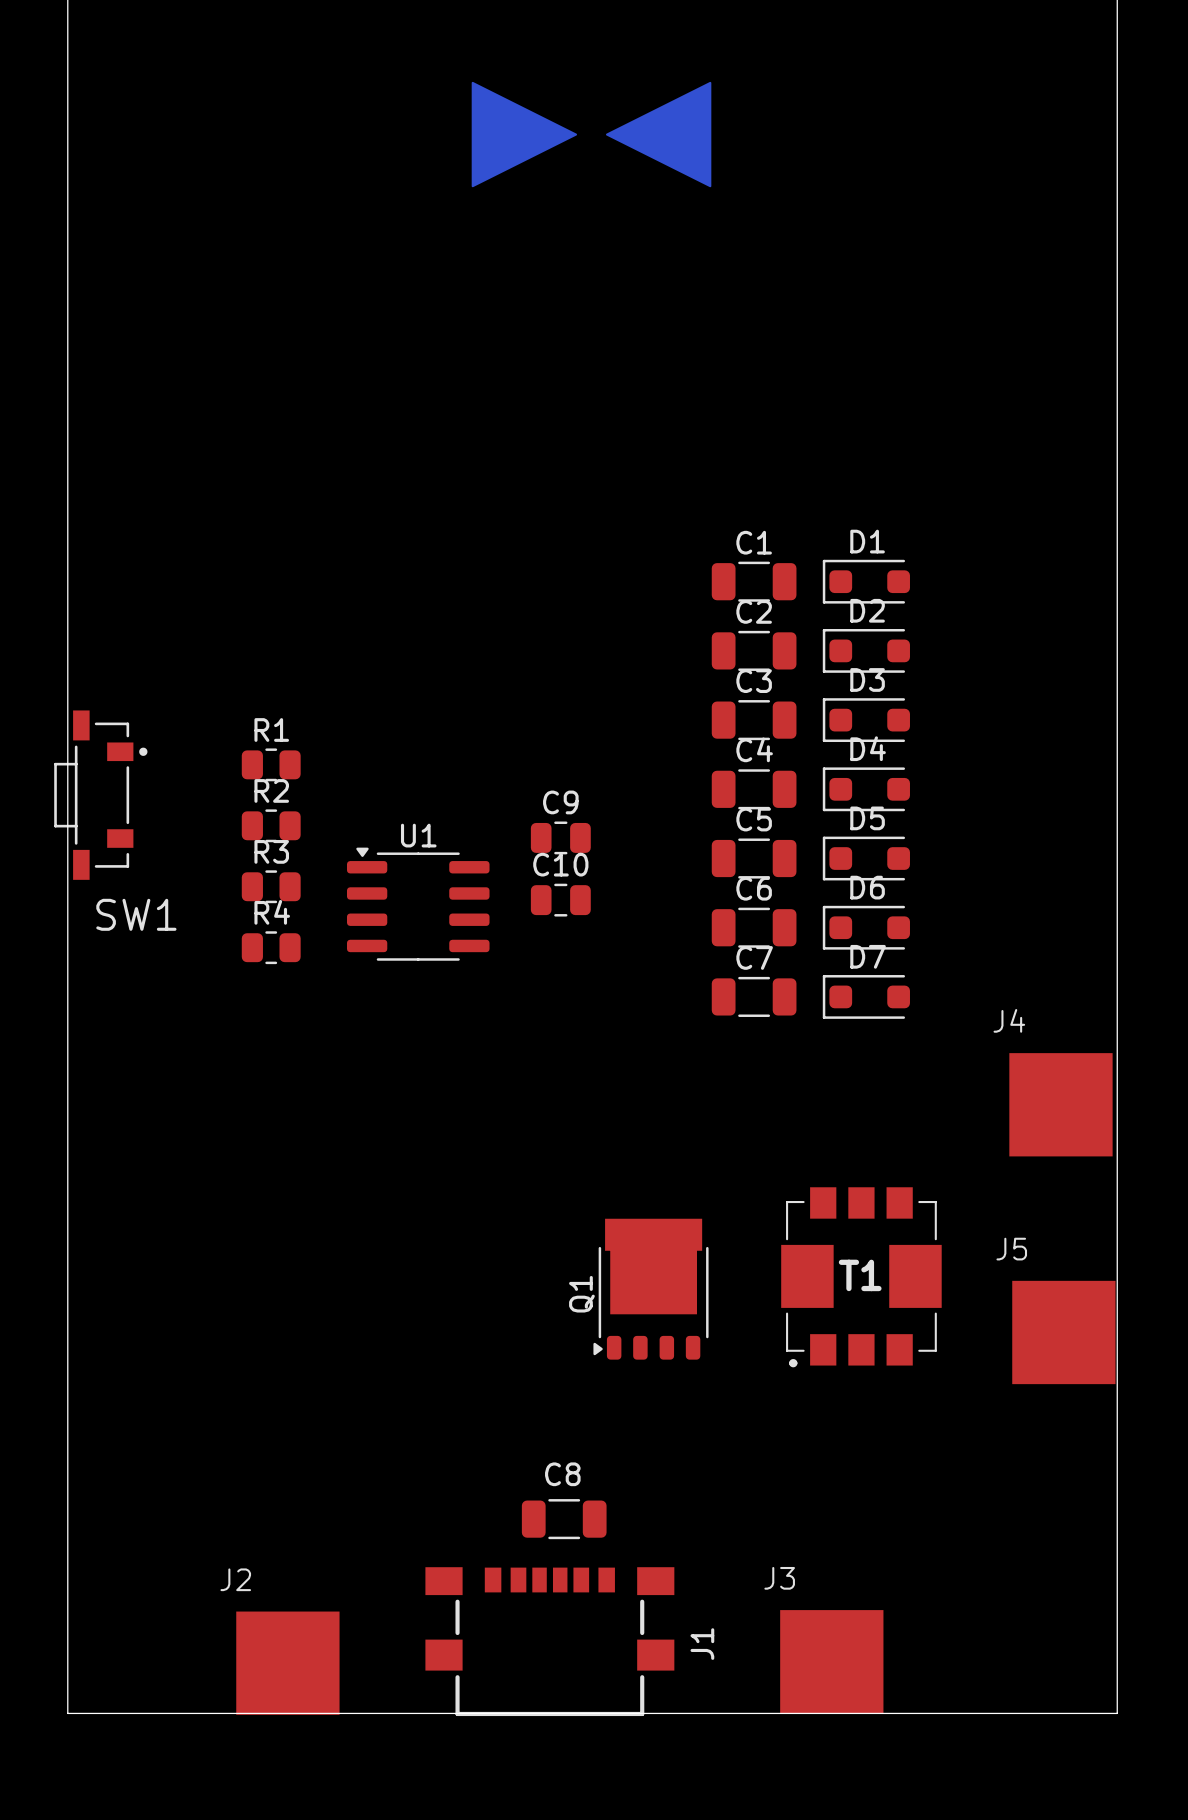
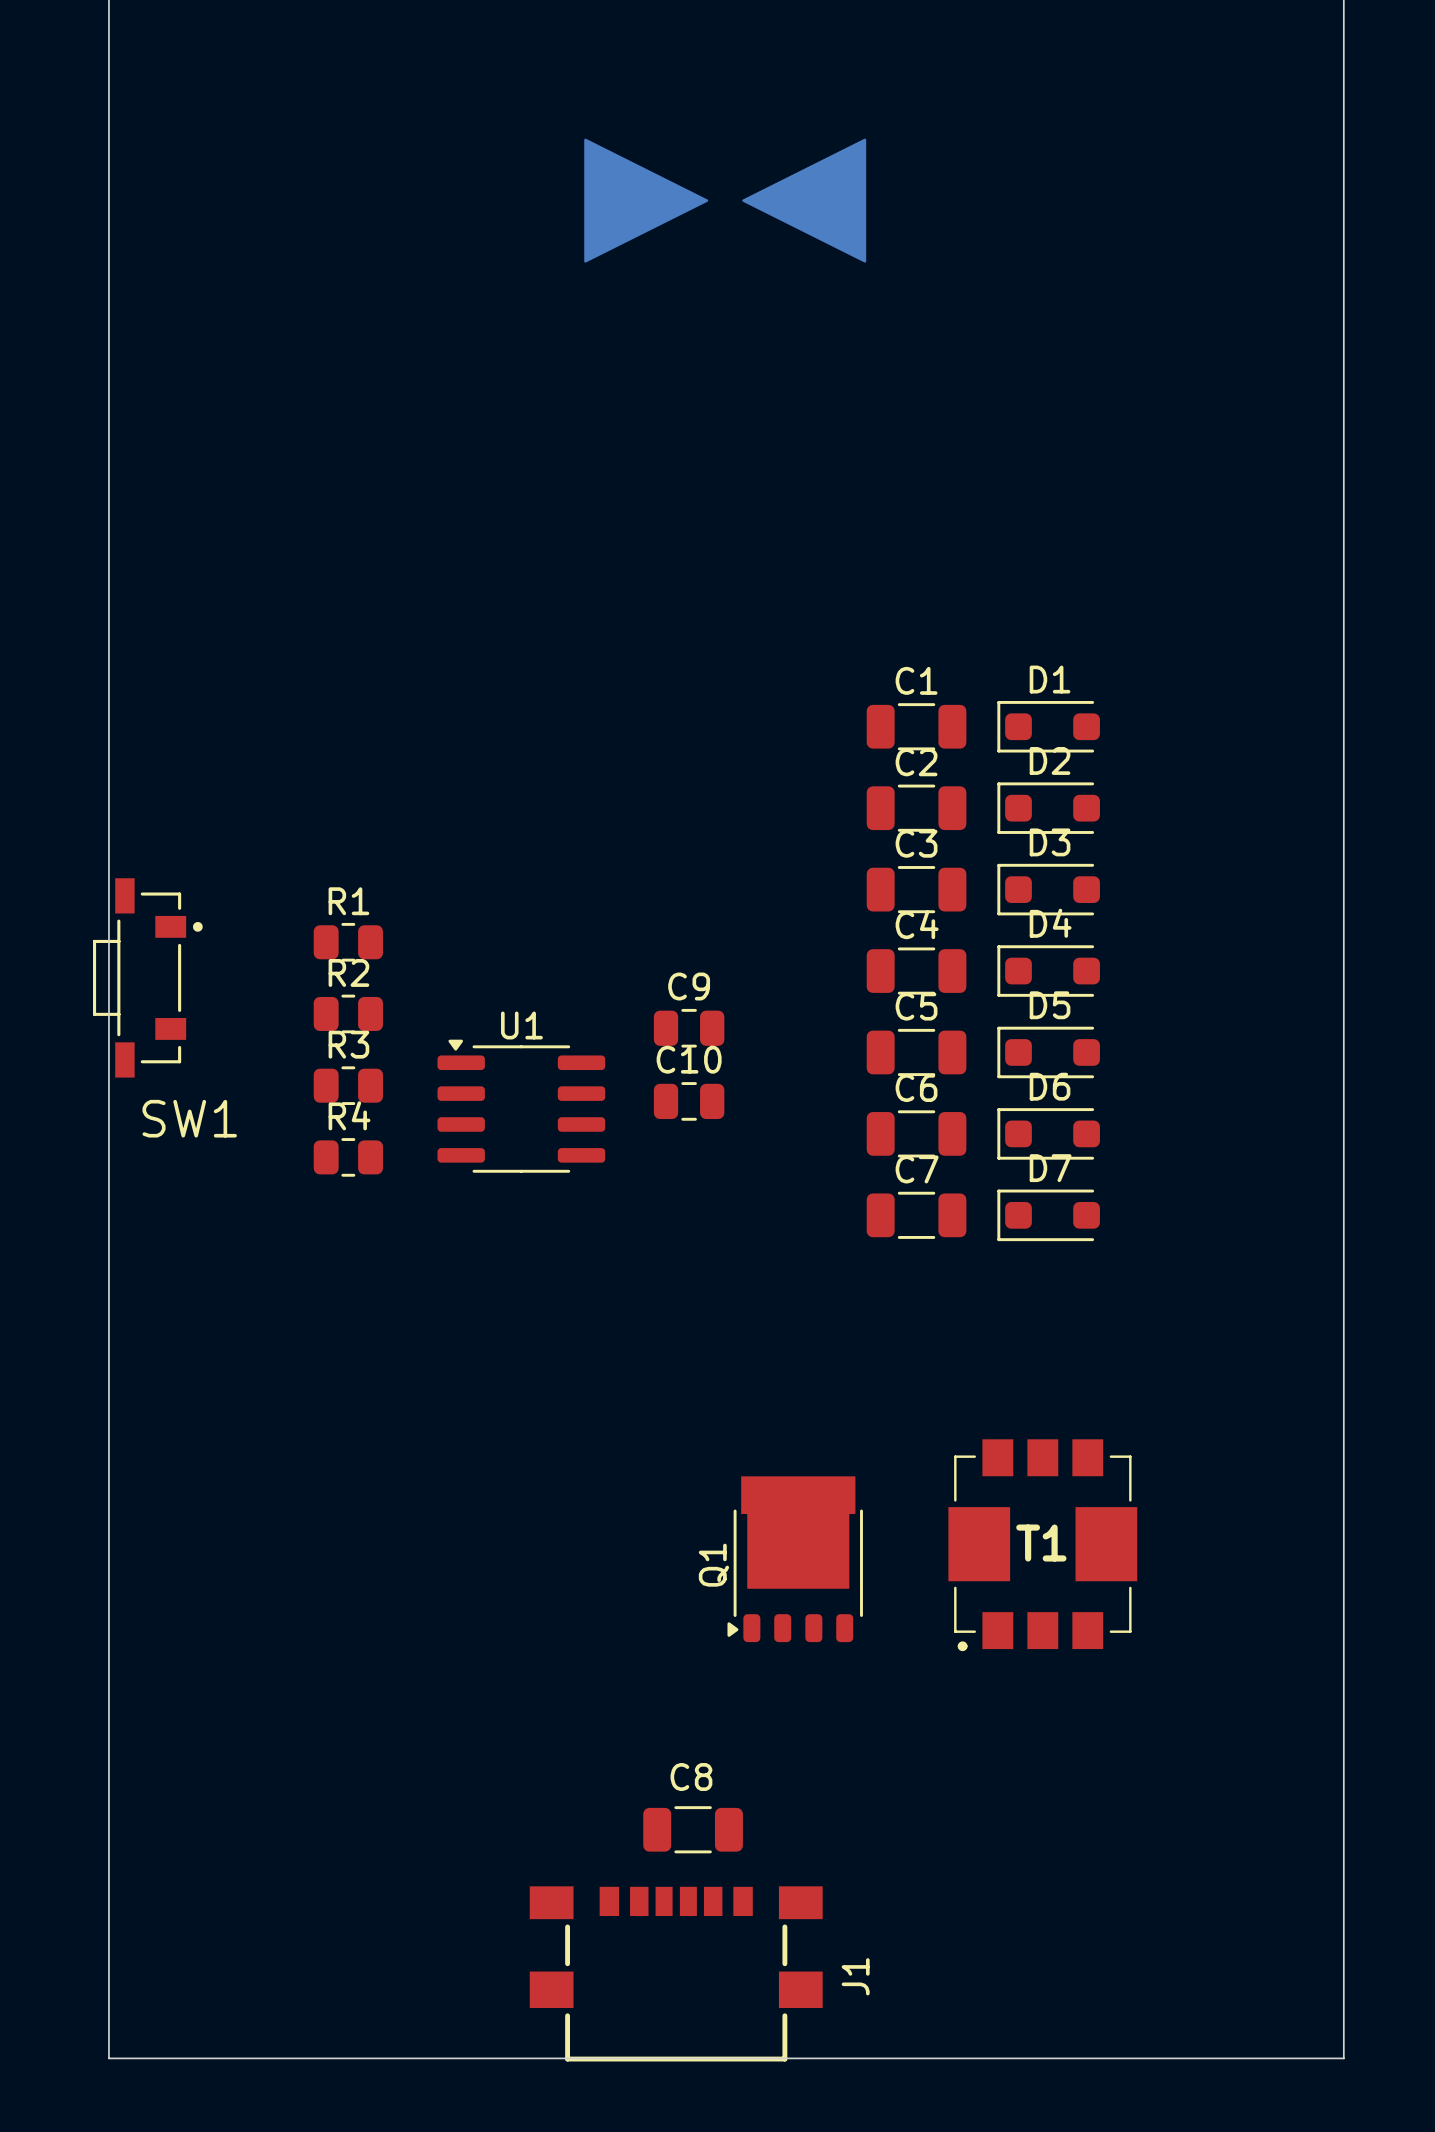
J4: (1060, 1104) -> none
J5: (1063, 1332) -> none
J3: (831, 1661) -> none
J2: (287, 1663) -> none

